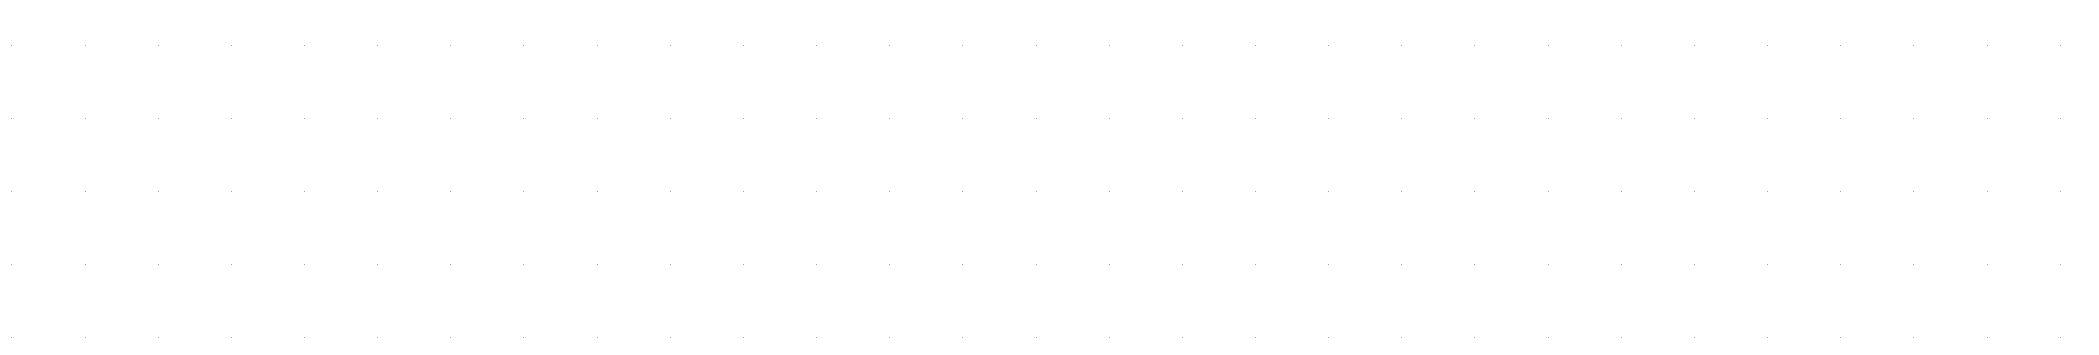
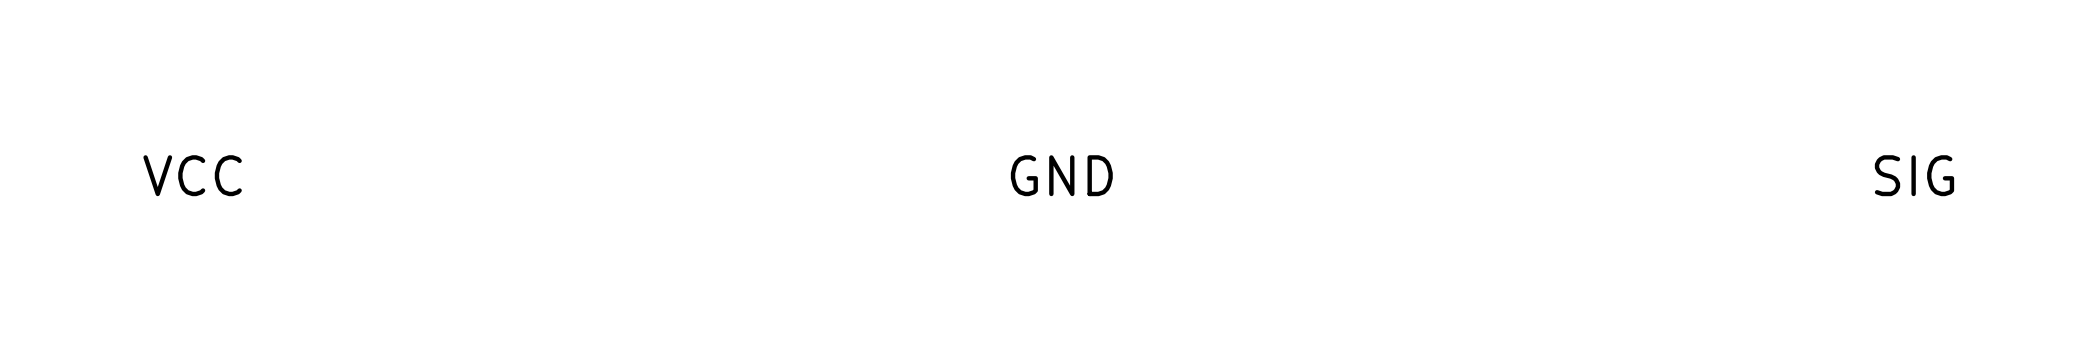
label: none -> VCC (192, 175)
label: none -> GND (1061, 175)
label: none -> SIG (1914, 175)

